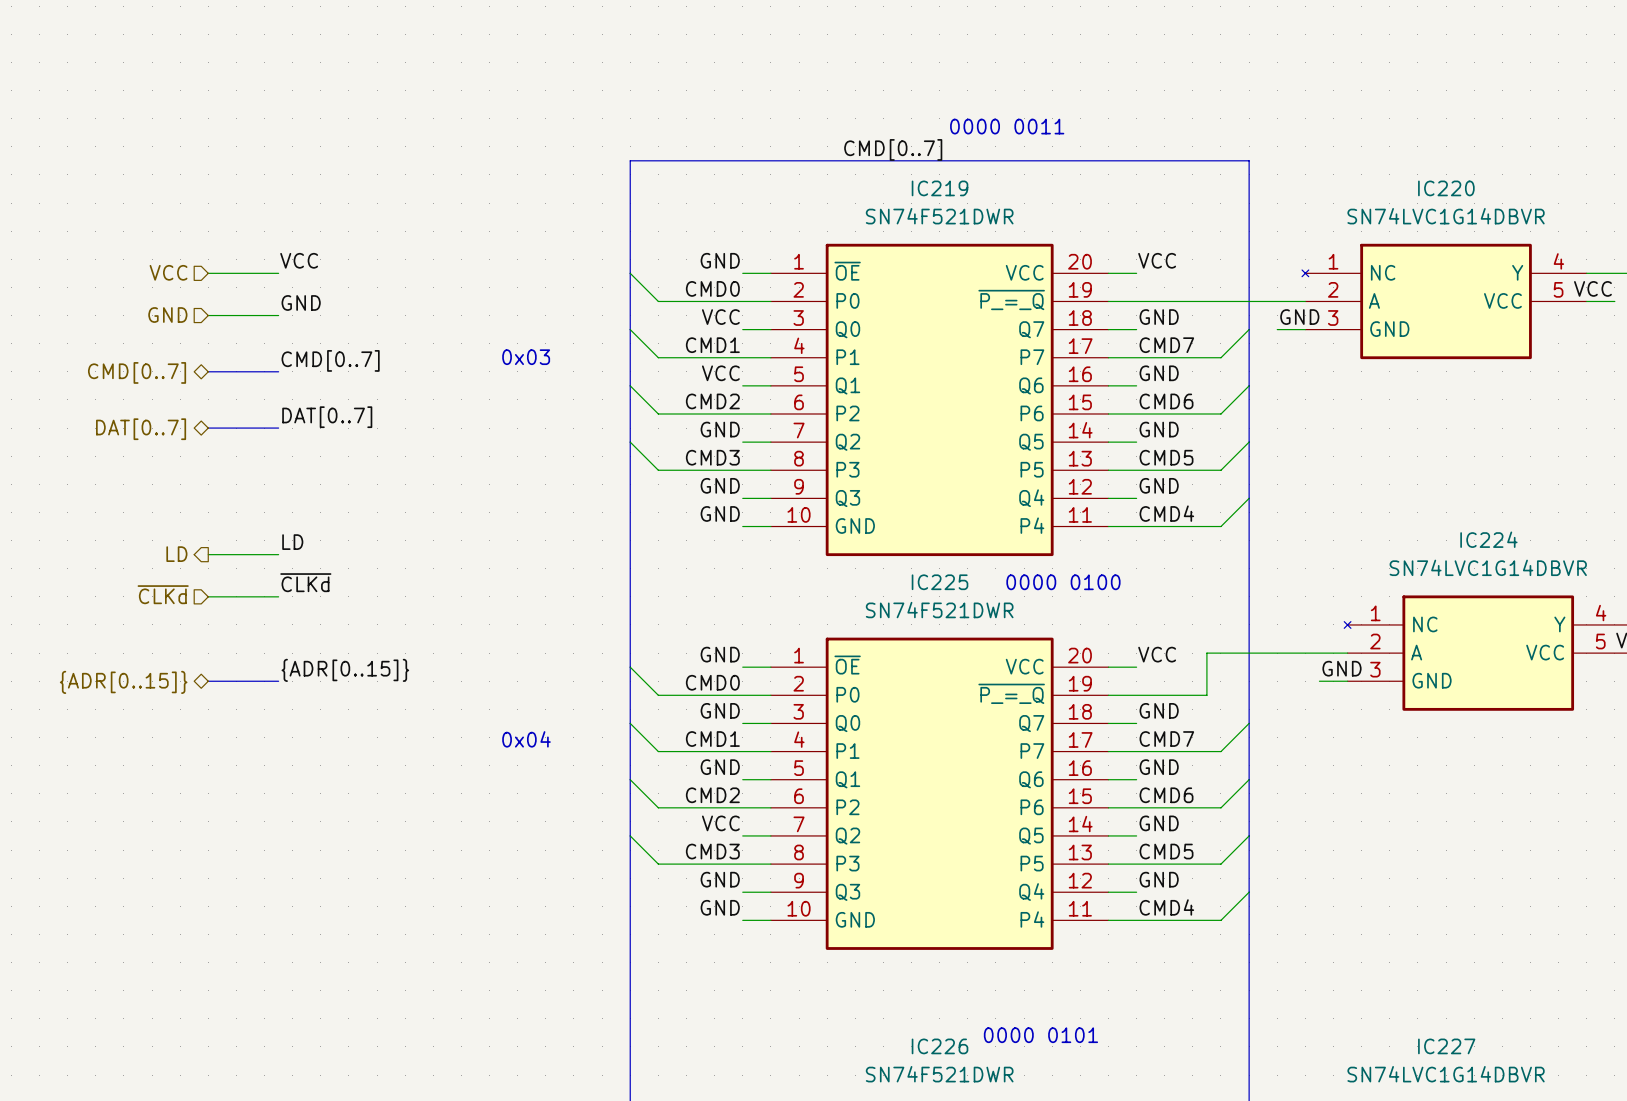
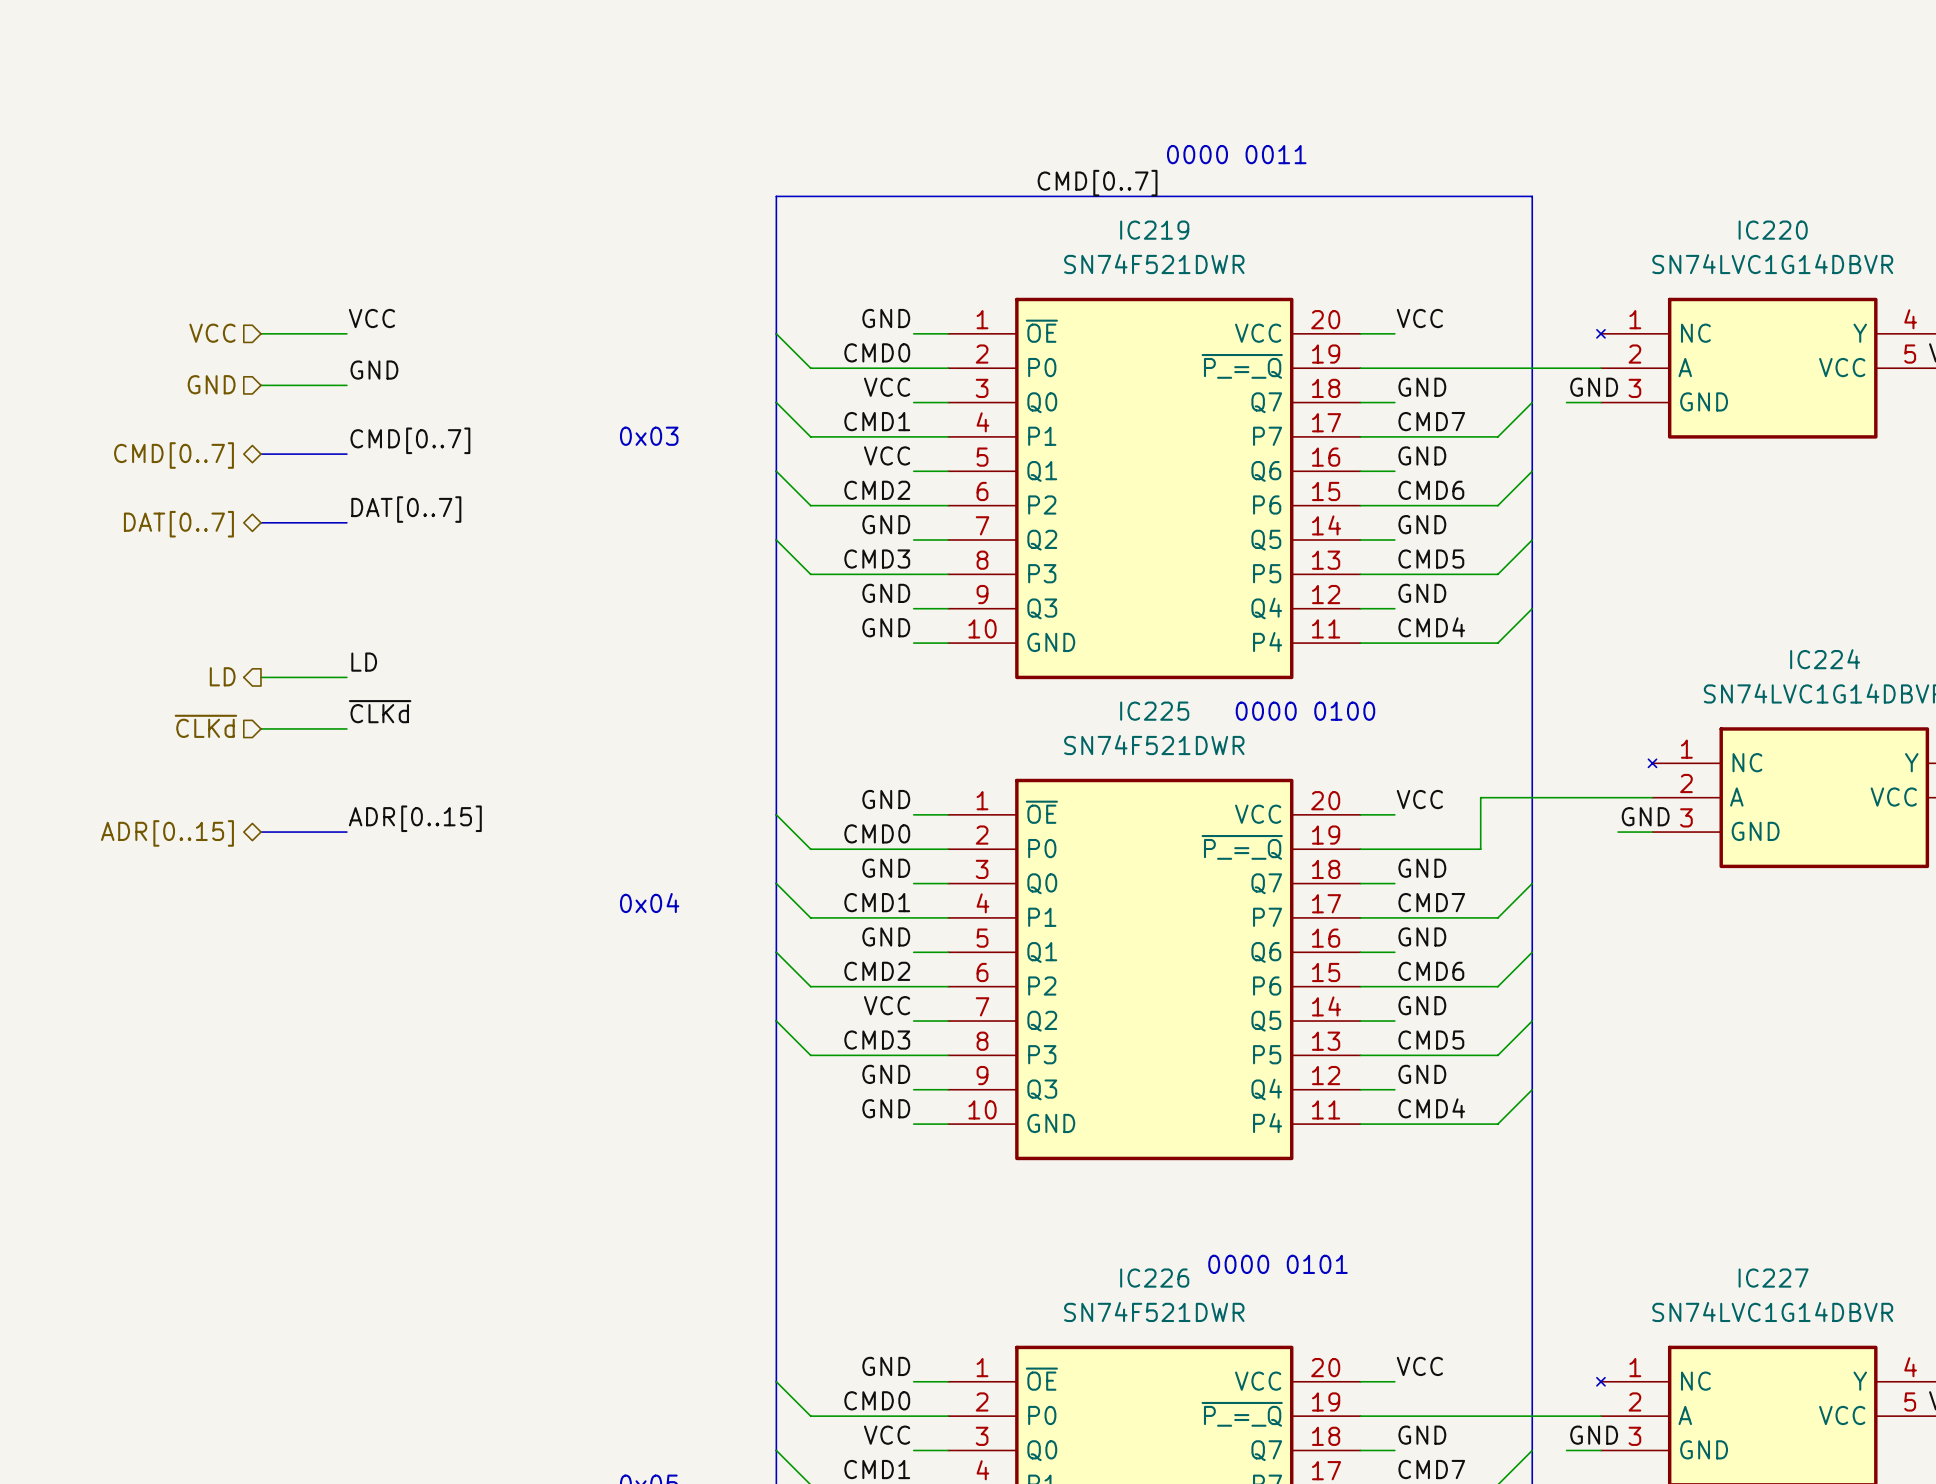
label: {ADR[0..15]} (345, 670) -> ADR[0..15] (415, 818)
hierarchical label: {ADR[0..15]} (123, 682) -> ADR[0..15] (167, 833)

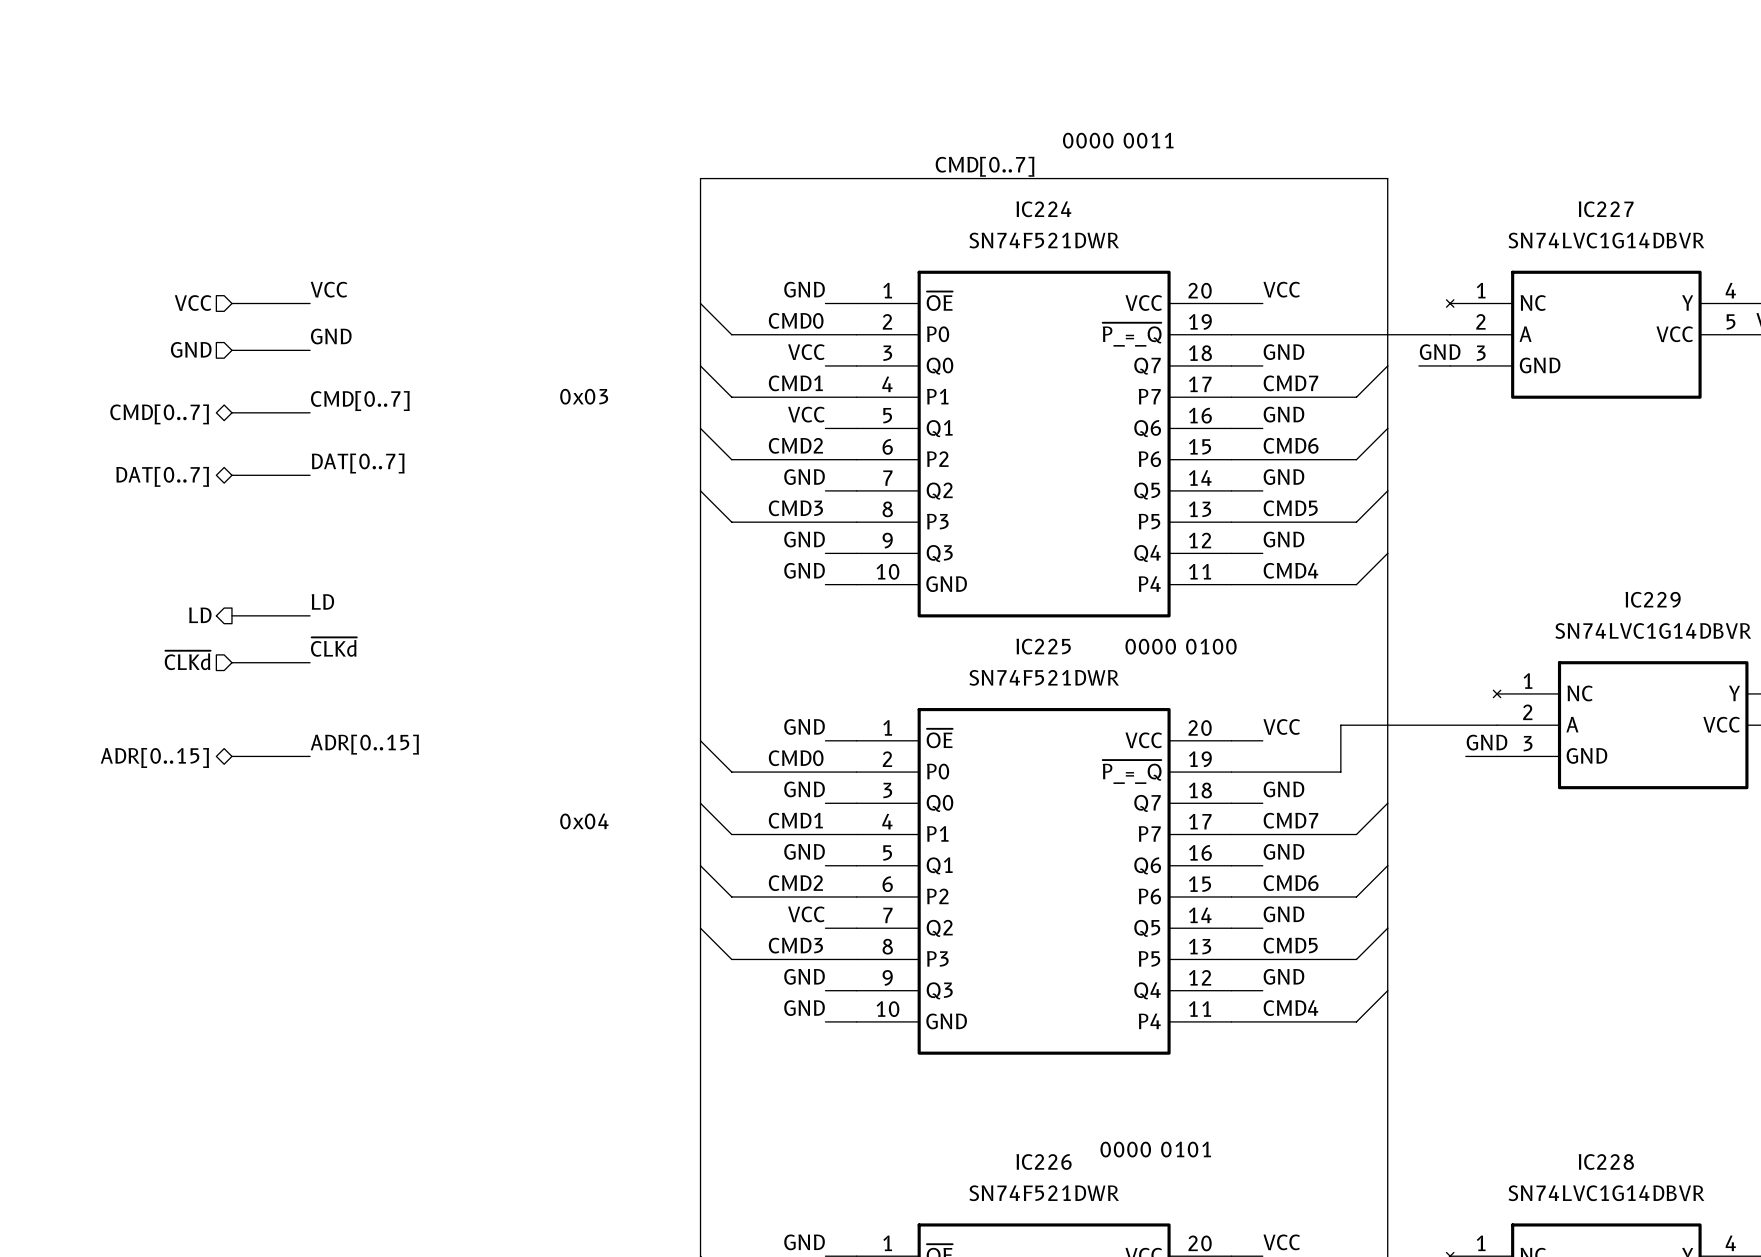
IC219 name: IC219 (1154, 230) -> IC224 (1043, 209)
IC220 name: IC220 (1773, 230) -> IC227 (1606, 209)
IC224 name: IC224 (1825, 659) -> IC229 (1653, 599)
IC227 name: IC227 (1773, 1278) -> IC228 (1606, 1162)

